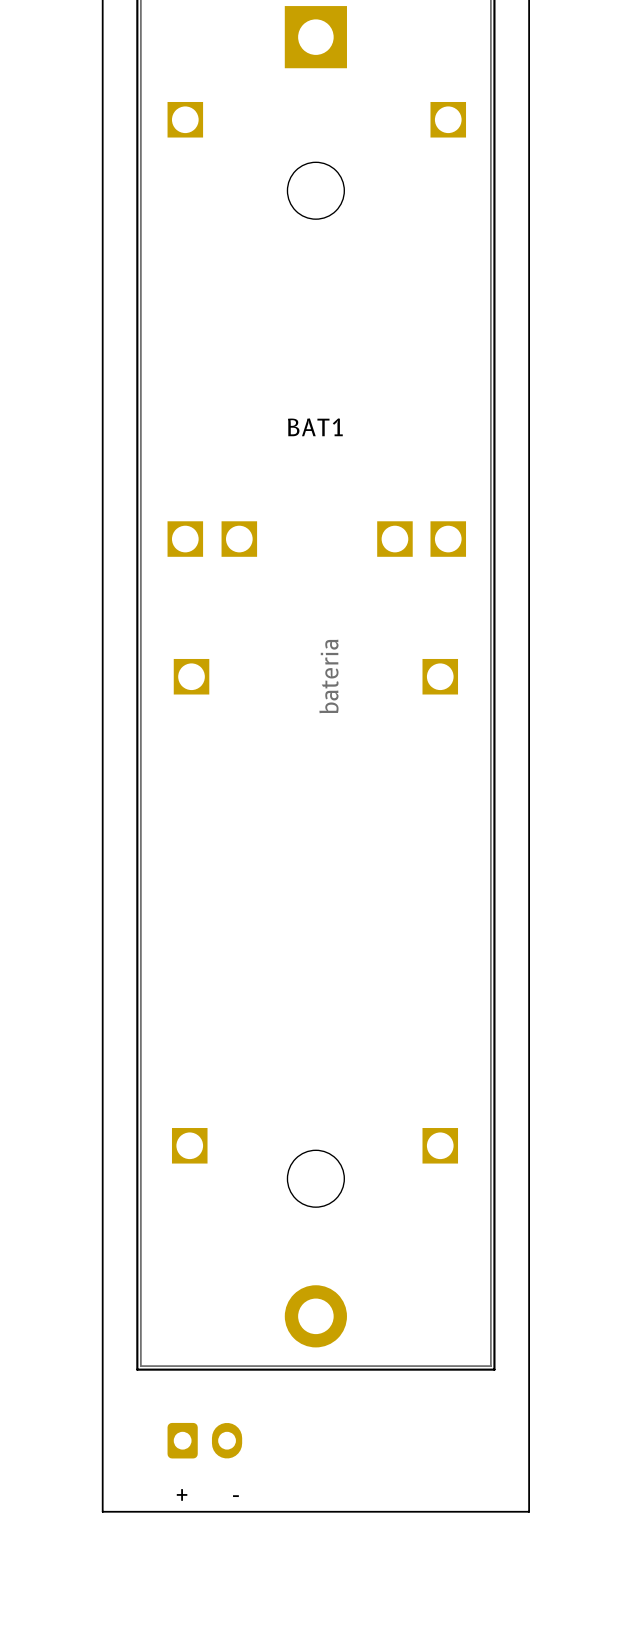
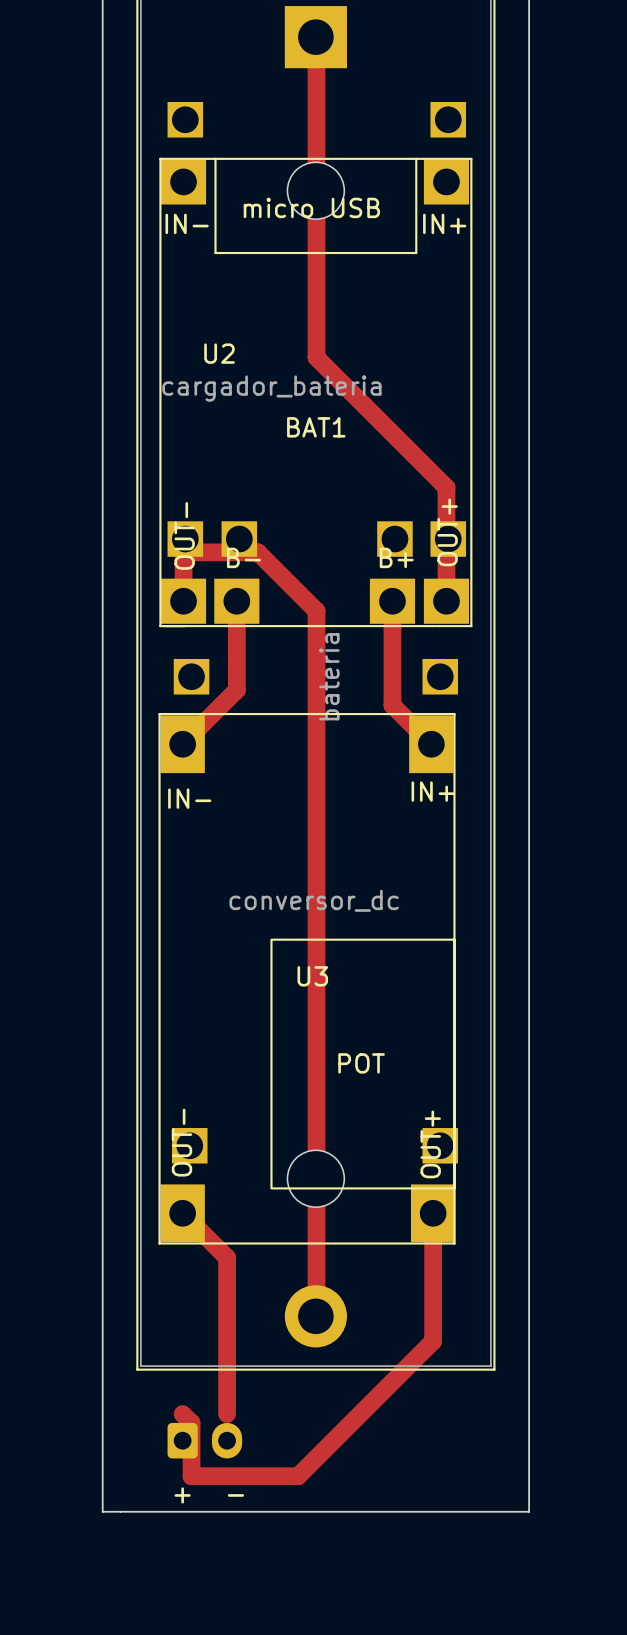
track: none -> (316, 30) (316, 357) (446, 487) (446, 601)
U2: none -> cargador_bateria (315, 392)
track: none -> (183, 601) (183, 560) (191, 552) (257, 552) (316, 610) (316, 1317)
track: none -> (236, 601) (236, 690) (182, 744)
track: none -> (392, 601) (392, 705) (431, 744)
U3: none -> conversor_dc (307, 978)
track: none -> (182, 1213) (227, 1257) (227, 1414)
track: none -> (433, 1213) (433, 1341) (298, 1476) (191, 1476) (191, 1422) (182, 1414)

